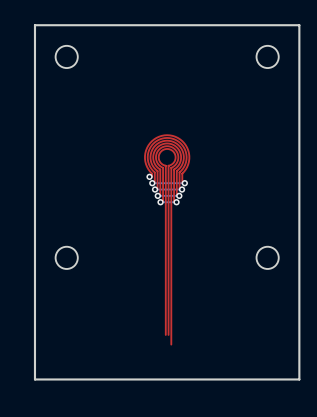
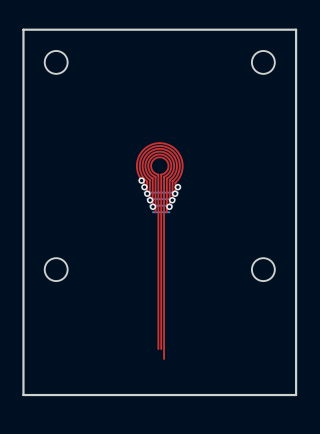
via: none -> (141, 180)
via: (149, 176) -> none
via: none -> (144, 187)
via: none -> (177, 187)
via: (152, 183) -> none
via: (184, 183) -> none
via: none -> (147, 193)
via: none -> (175, 193)
via: (155, 189) -> none
via: (182, 189) -> none
via: none -> (150, 200)
via: none -> (172, 200)
via: (157, 195) -> none
via: (179, 195) -> none
via: none -> (152, 206)
via: none -> (169, 206)
via: (160, 202) -> none
via: (176, 202) -> none

